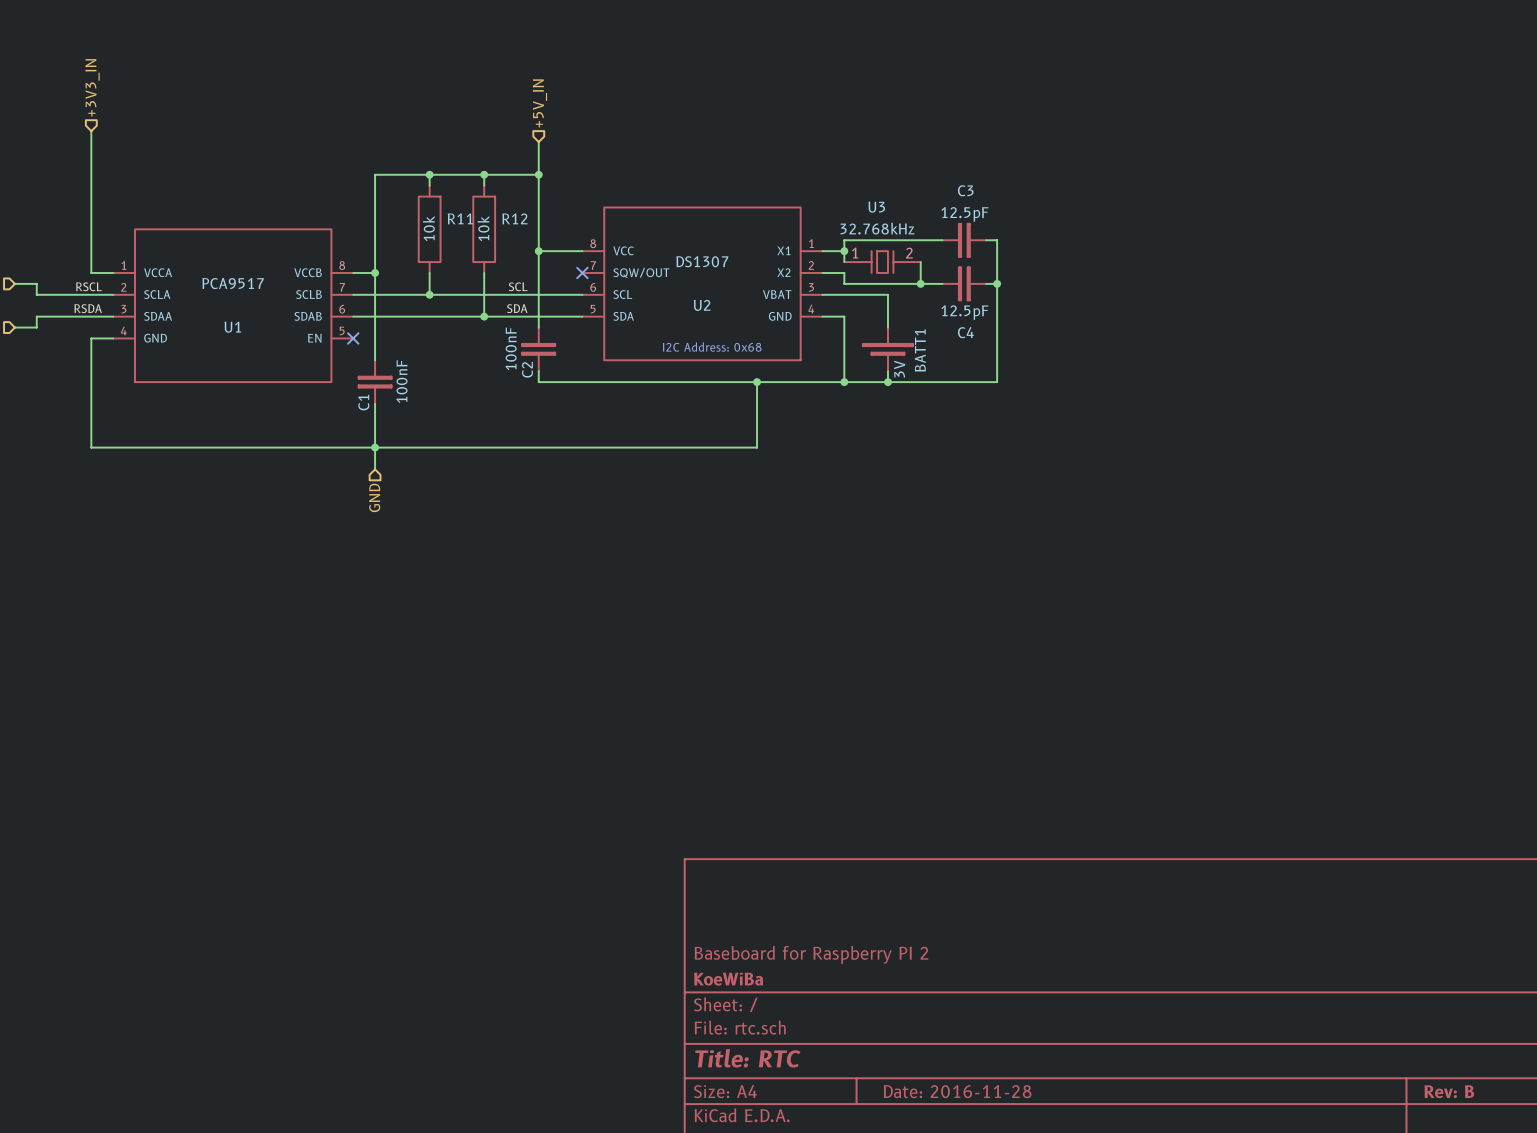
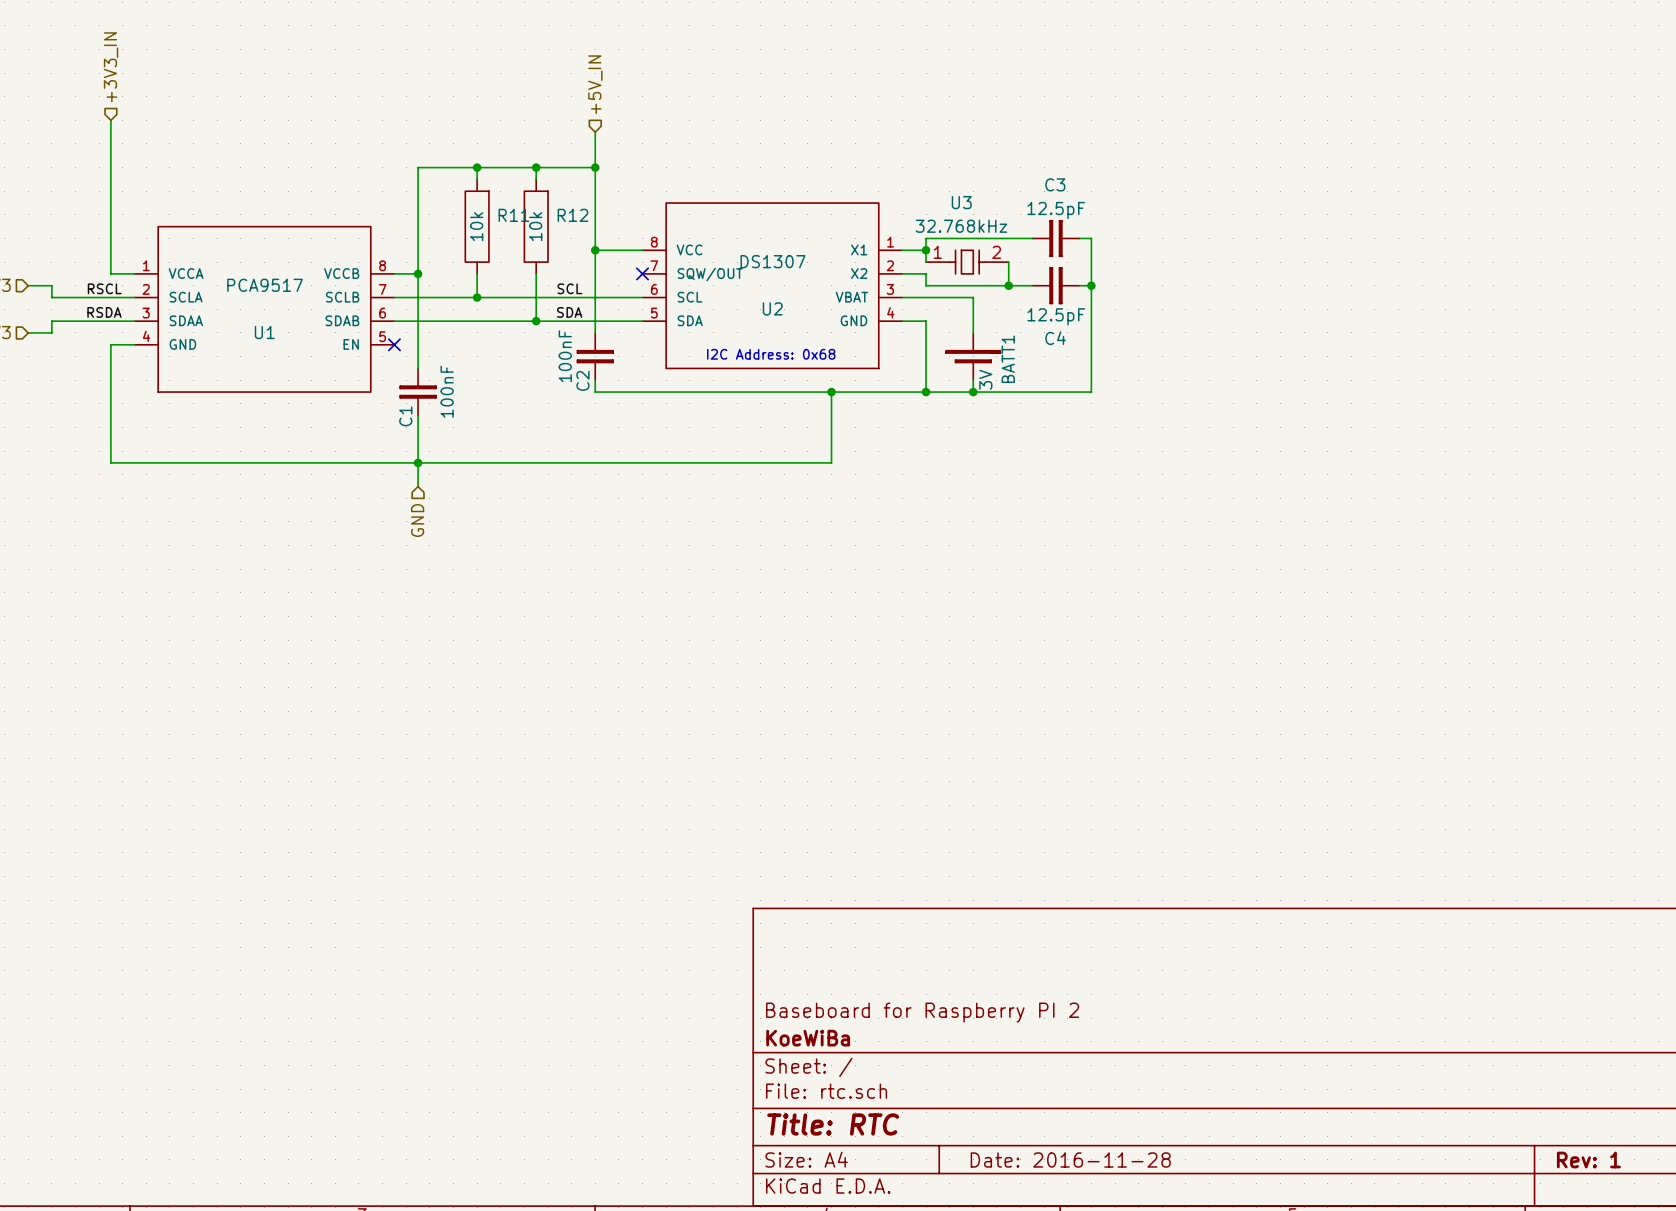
title block: Rev: B (1449, 1091) -> Rev: 1 (1588, 1160)

